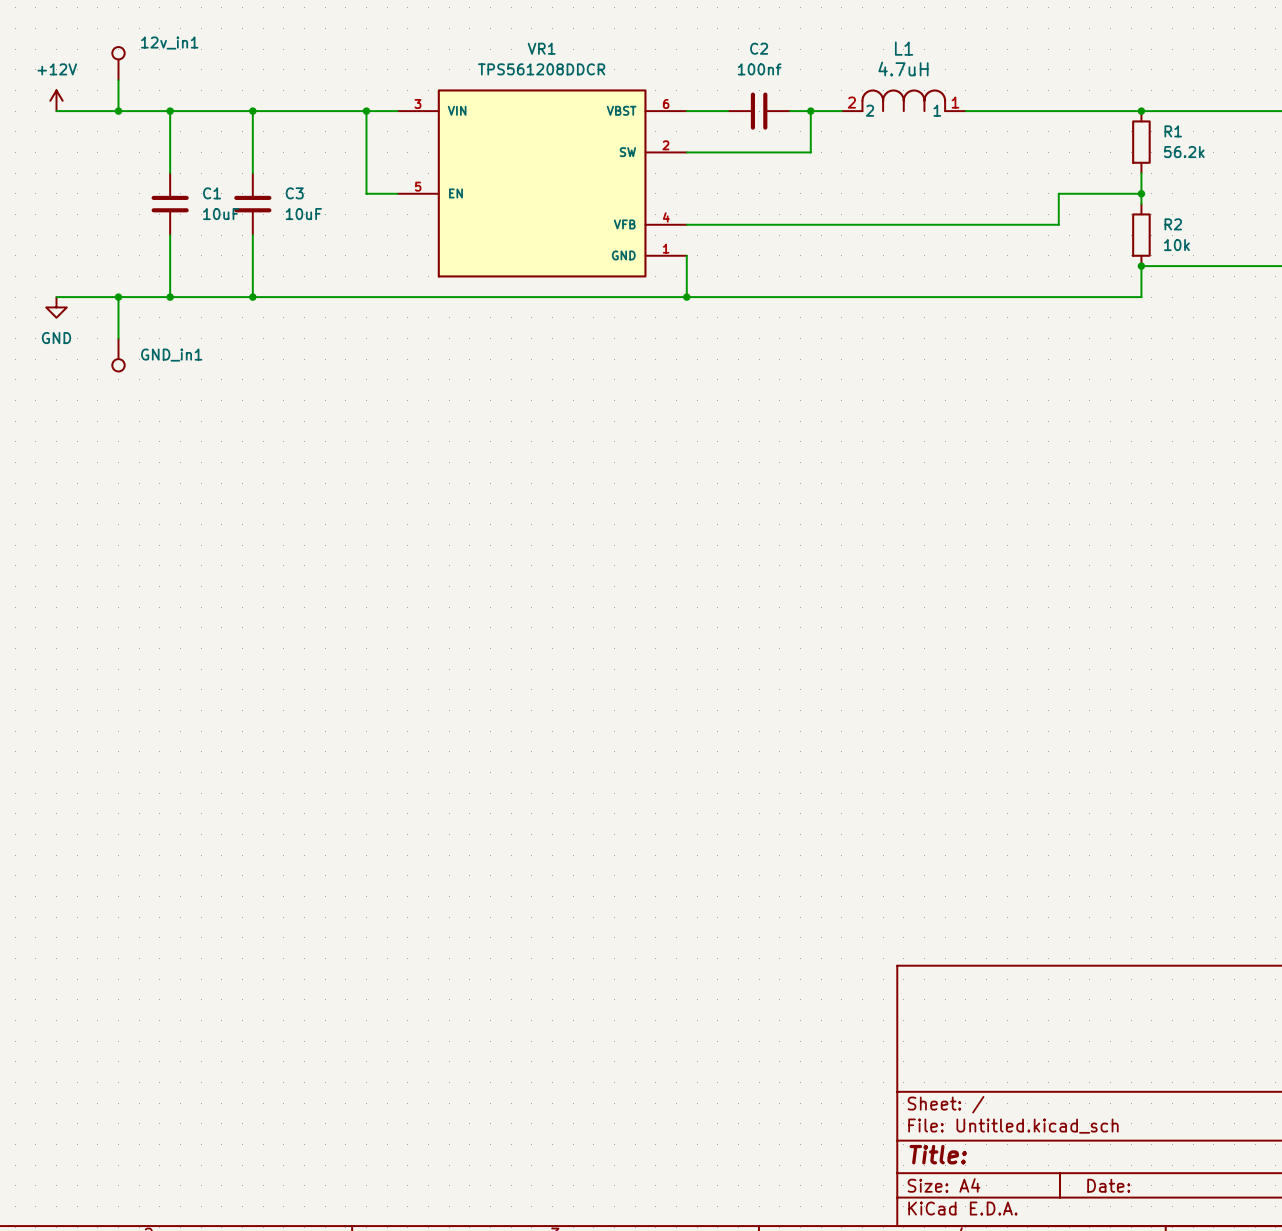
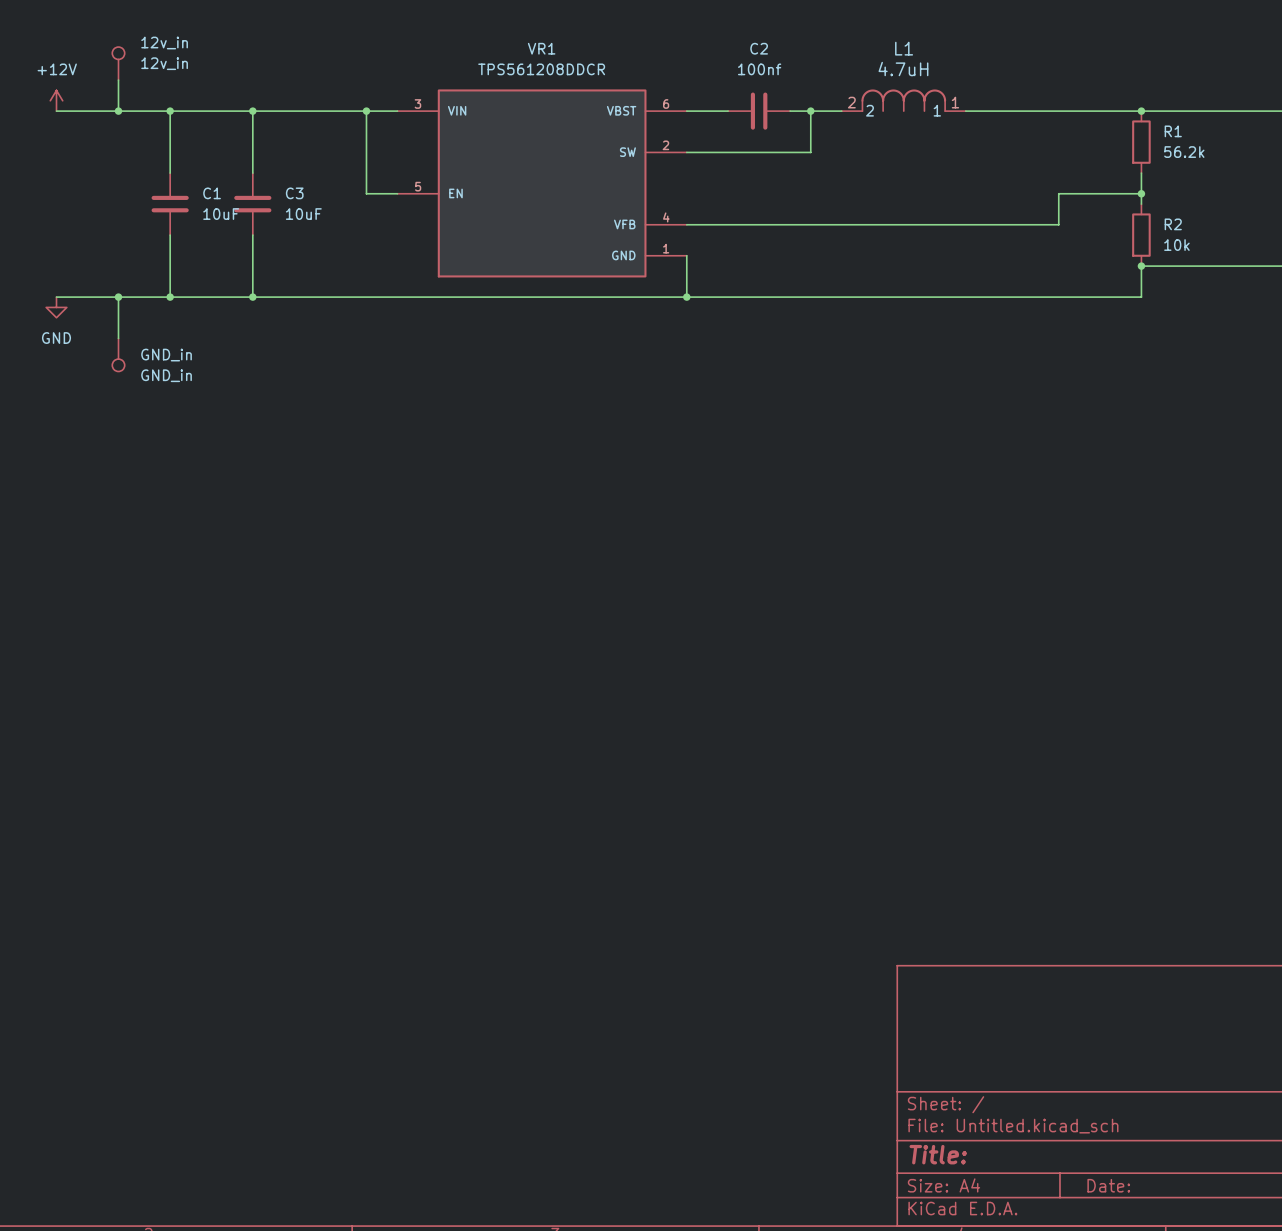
12v_in1 name: 12v_in1 (169, 43) -> 12v_in (164, 43)
12v_in1 value: none -> 12v_in (164, 63)
GND_in1 name: GND_in1 (171, 355) -> GND_in (166, 355)
GND_in1 value: none -> GND_in (166, 375)

